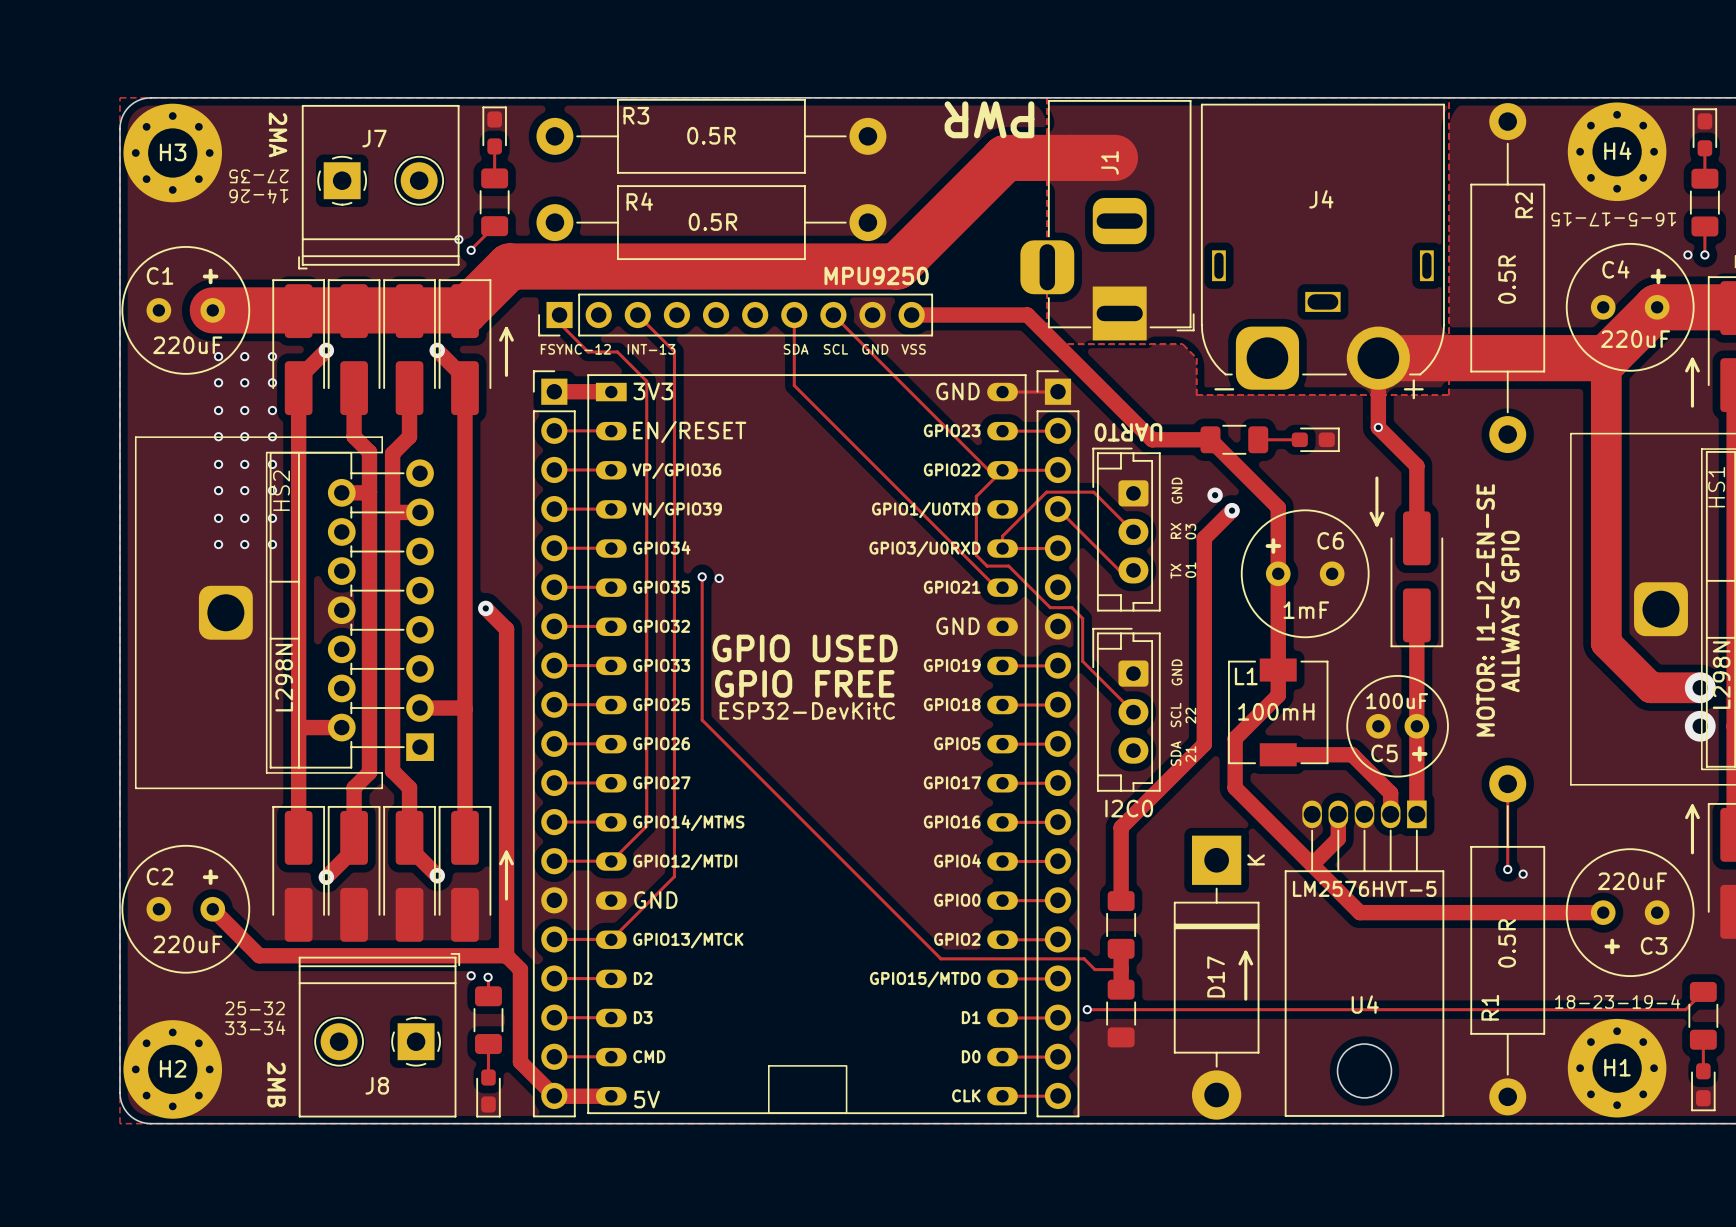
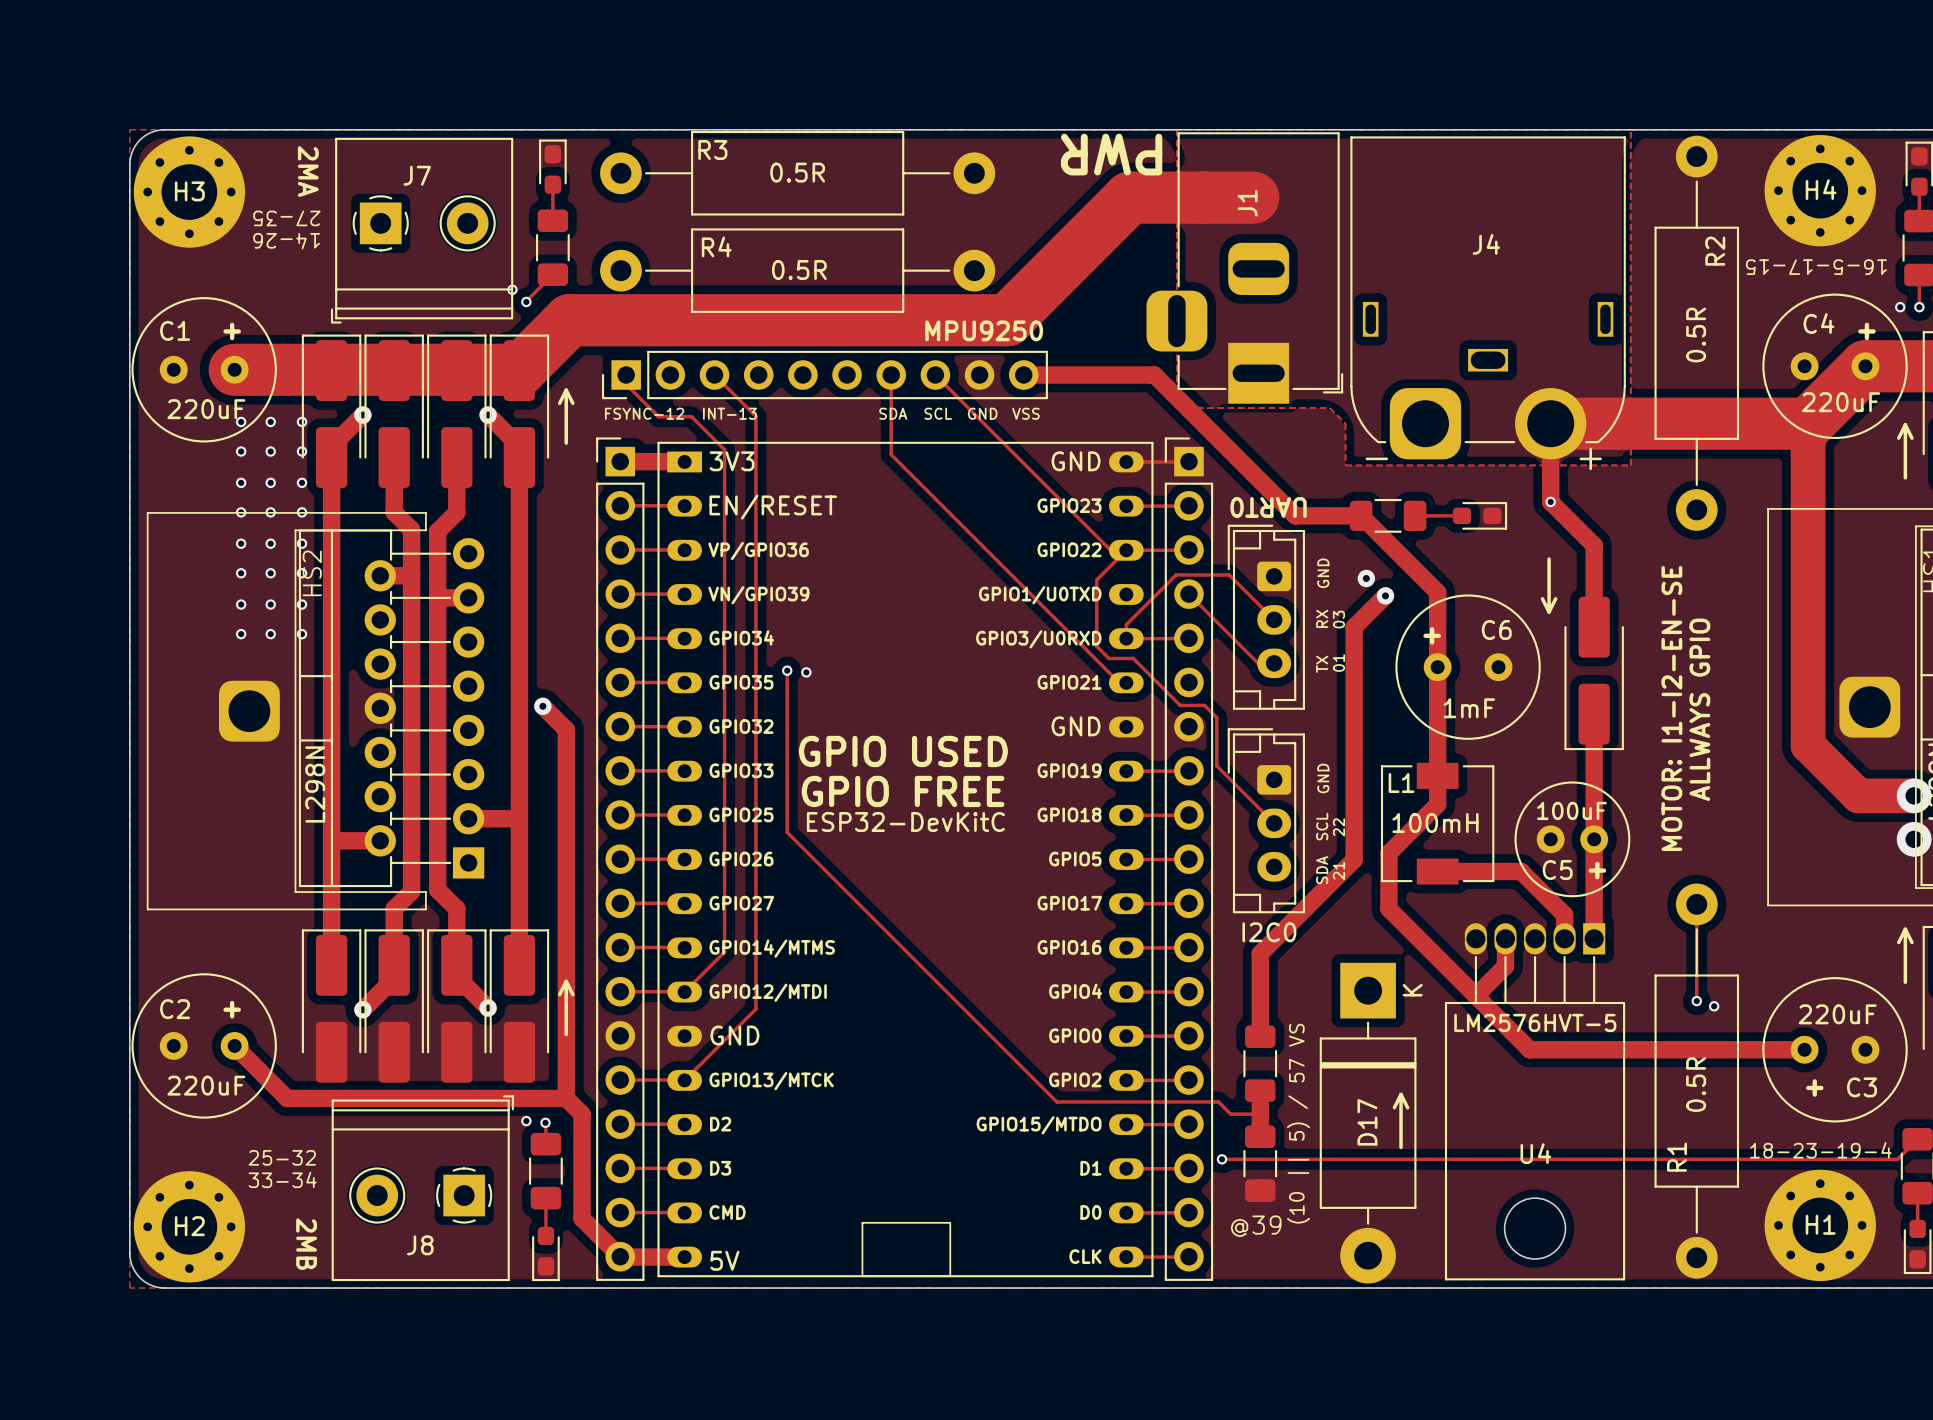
text: none -> (10 || 5) / 57 VS (1298, 1123)
text: none -> @39 (1256, 1226)

